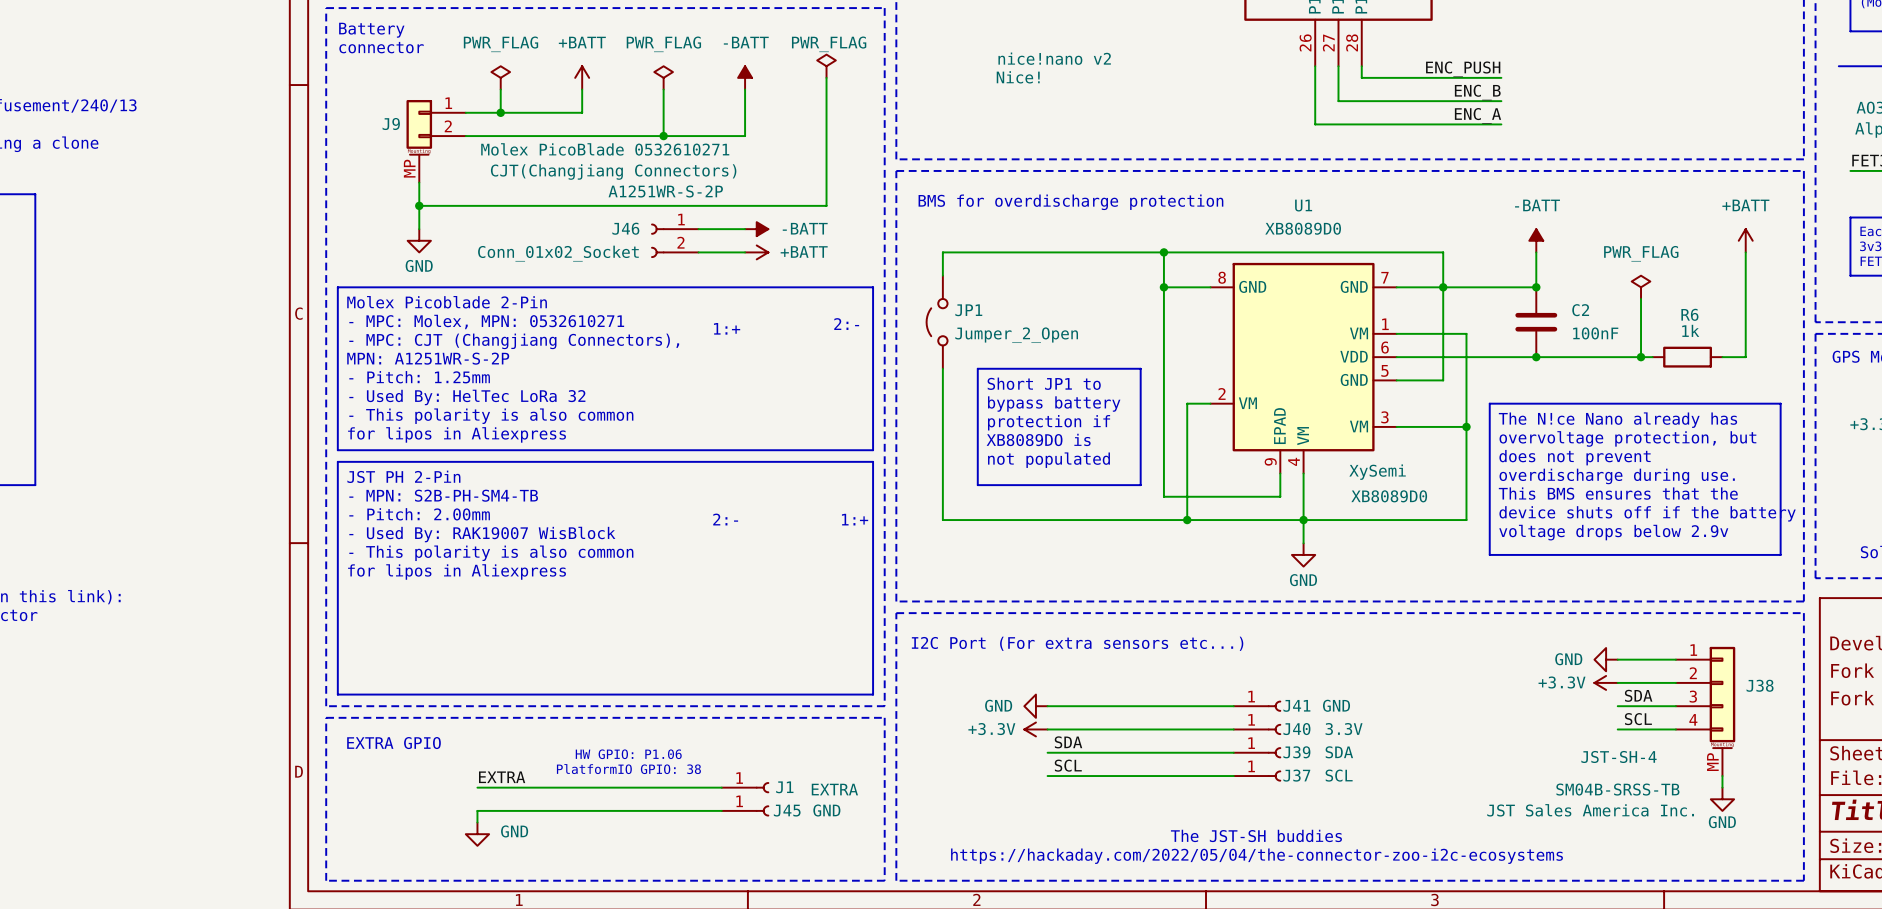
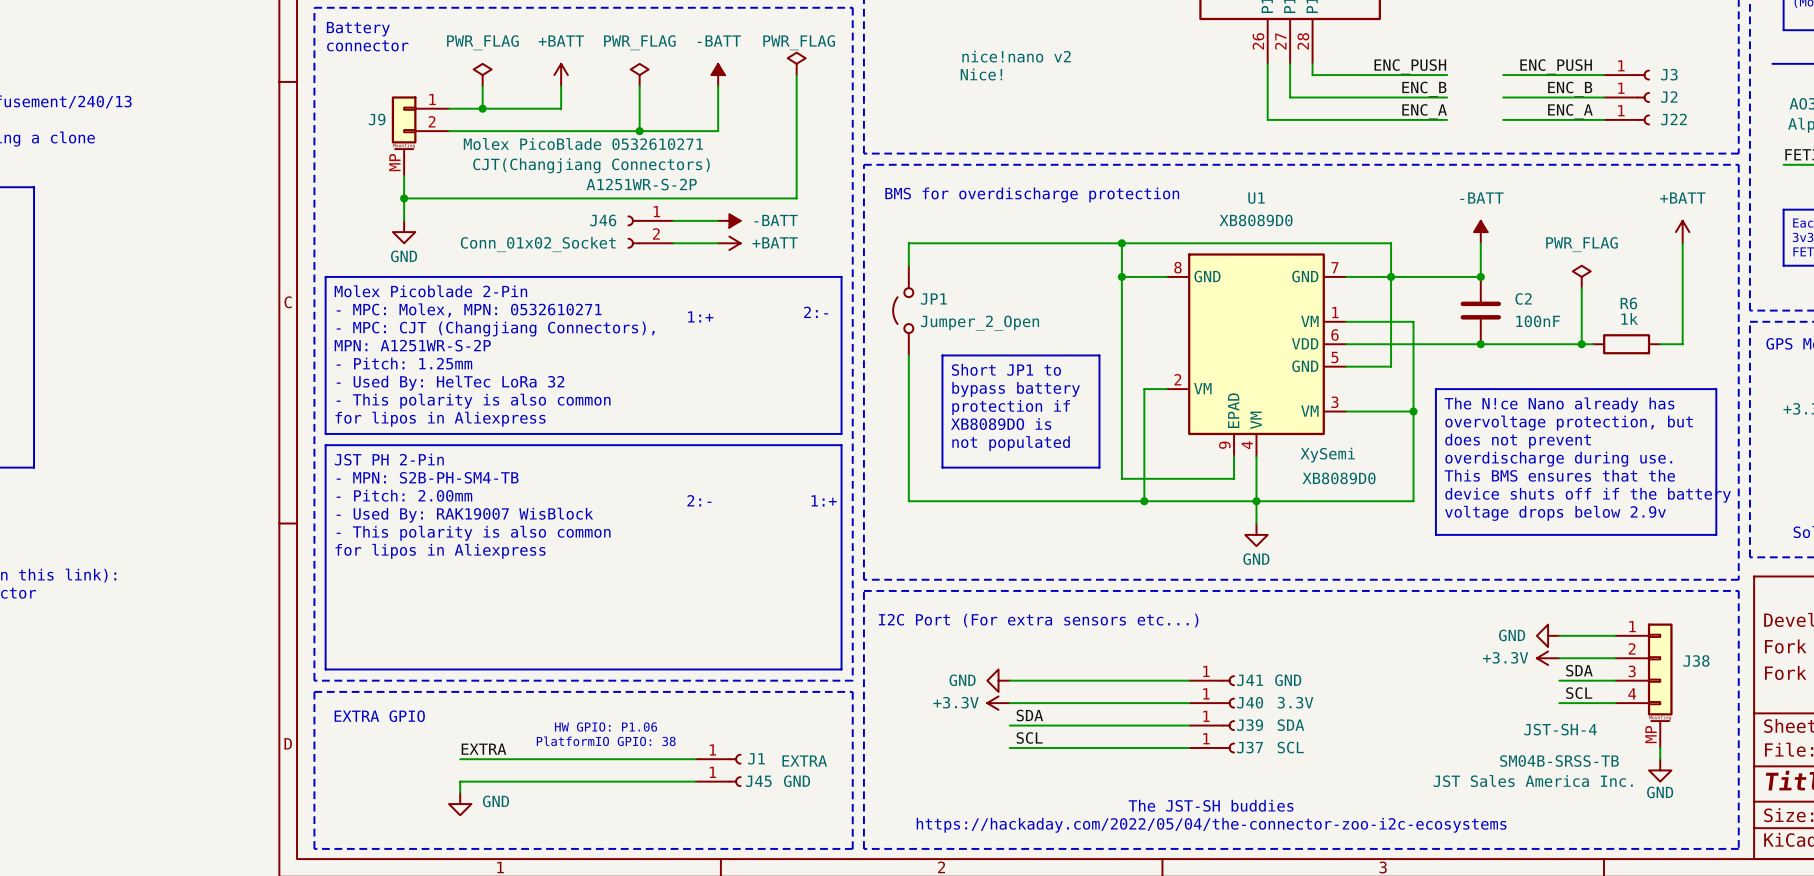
label: none -> ENC_PUSH (1556, 66)
wire: none -> (1503, 75) (1604, 75)
J3: none -> (1626, 75)
label: none -> ENC_B (1570, 89)
wire: none -> (1503, 97) (1604, 97)
J2: none -> (1626, 97)
label: none -> ENC_A (1570, 111)
wire: none -> (1503, 119) (1604, 119)
J22: none -> (1626, 119)

